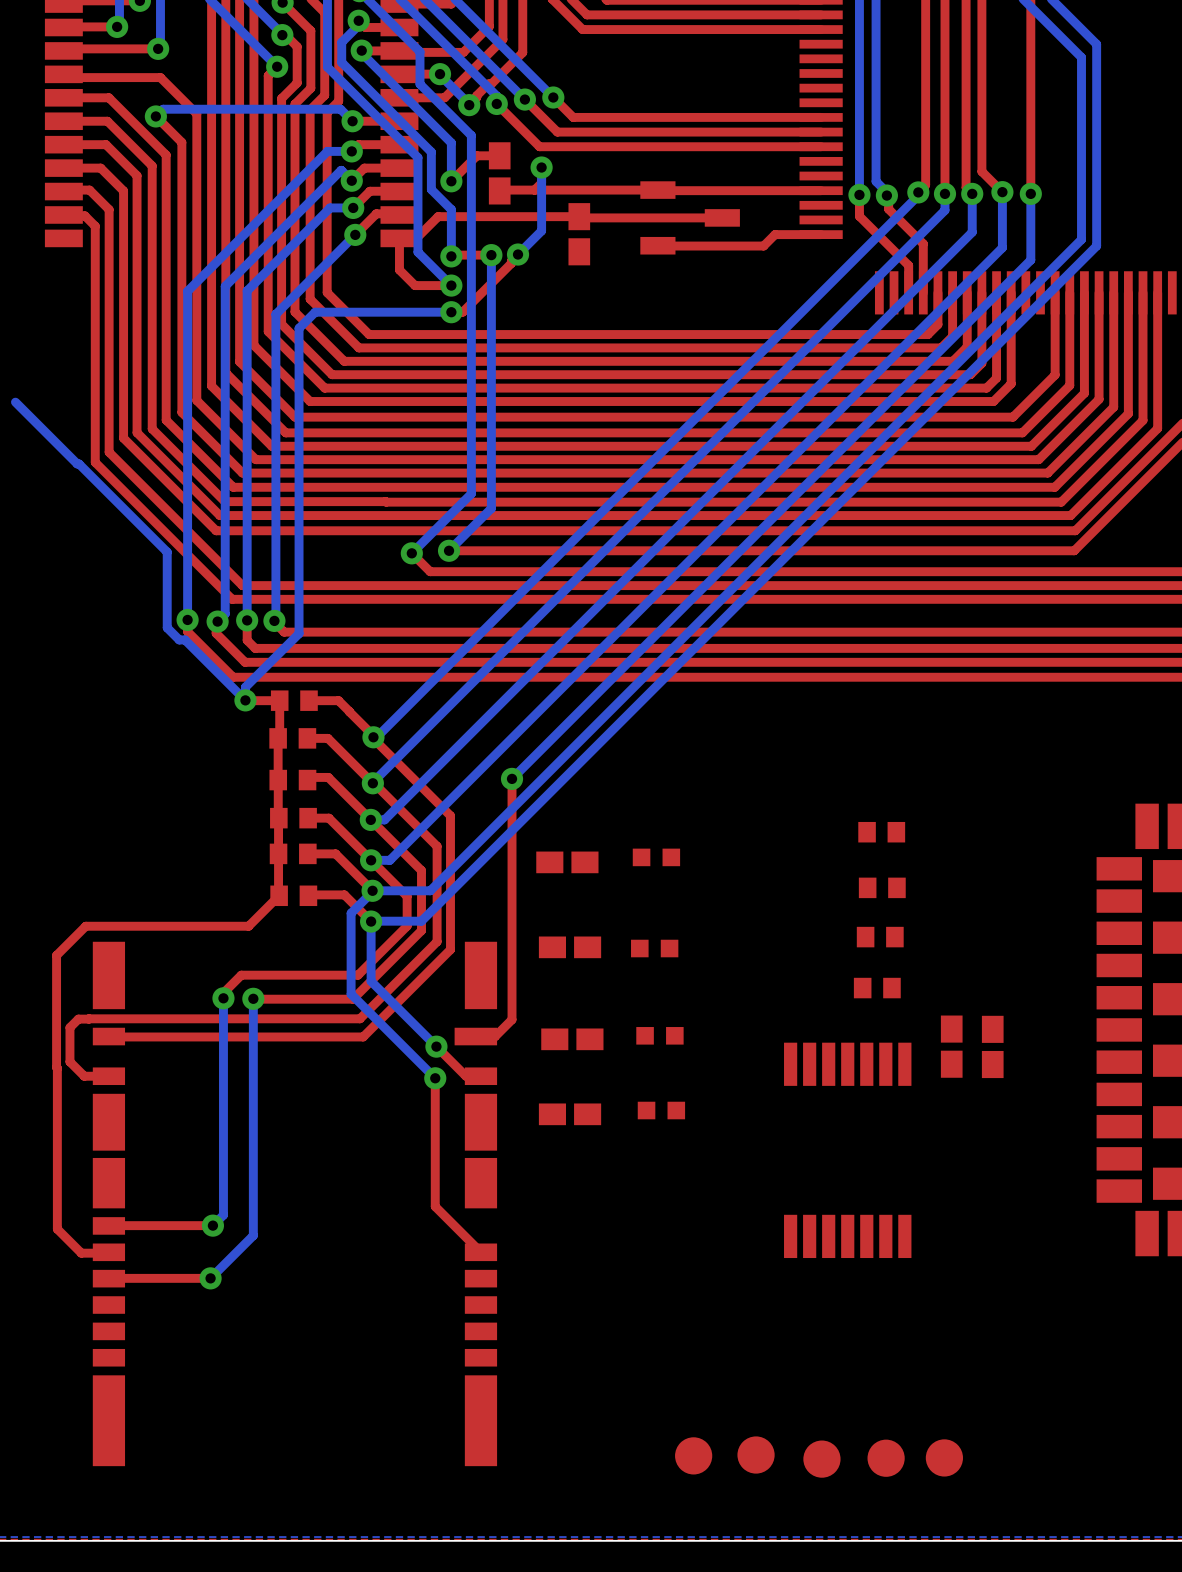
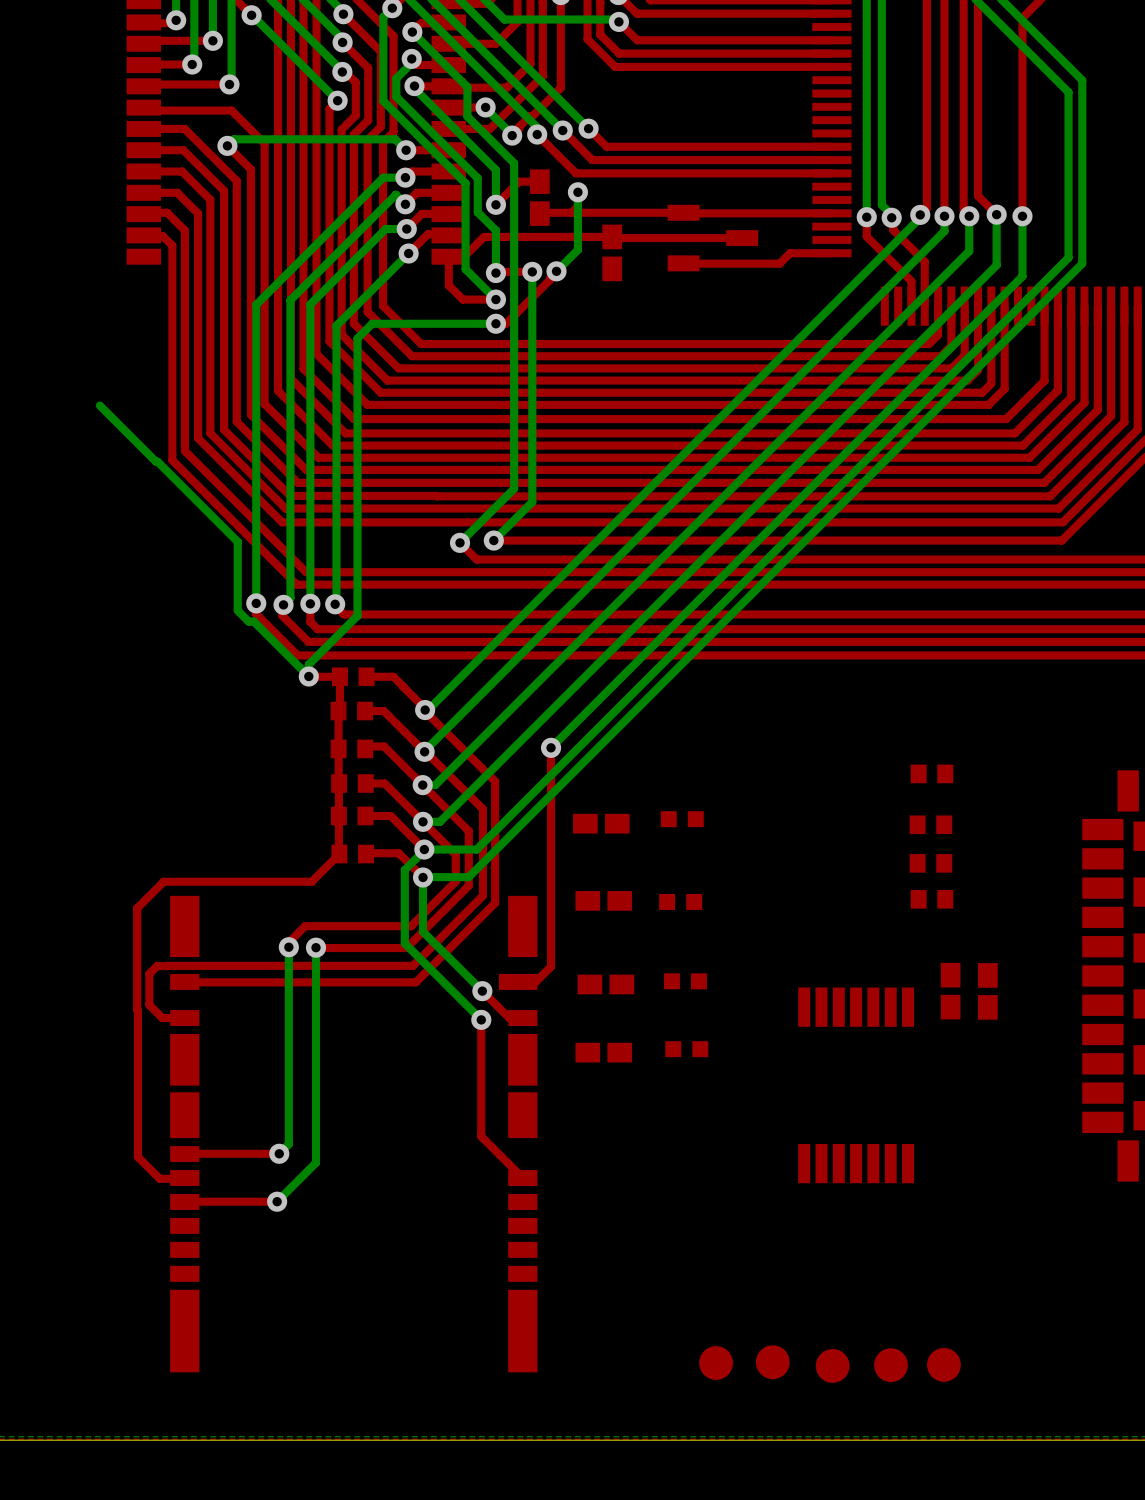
part: none -> (931, 773)
part: (881, 832) -> none
part: none -> (930, 824)
part: (882, 887) -> none
part: none -> (930, 863)
part: (880, 937) -> none
part: none -> (931, 899)
part: (877, 988) -> none

